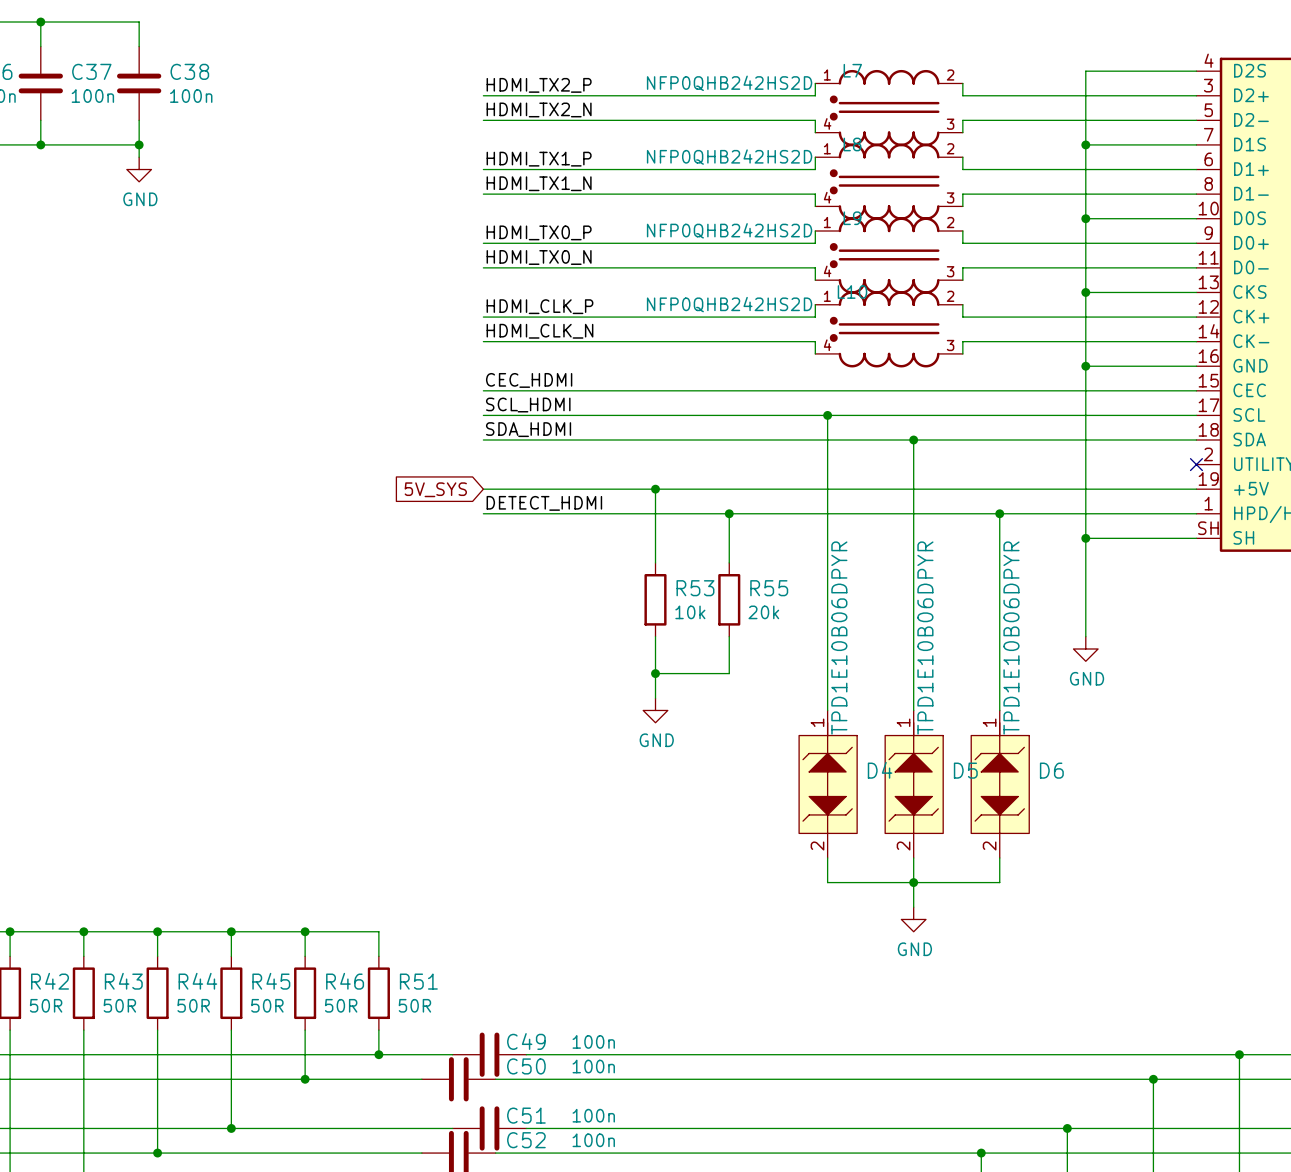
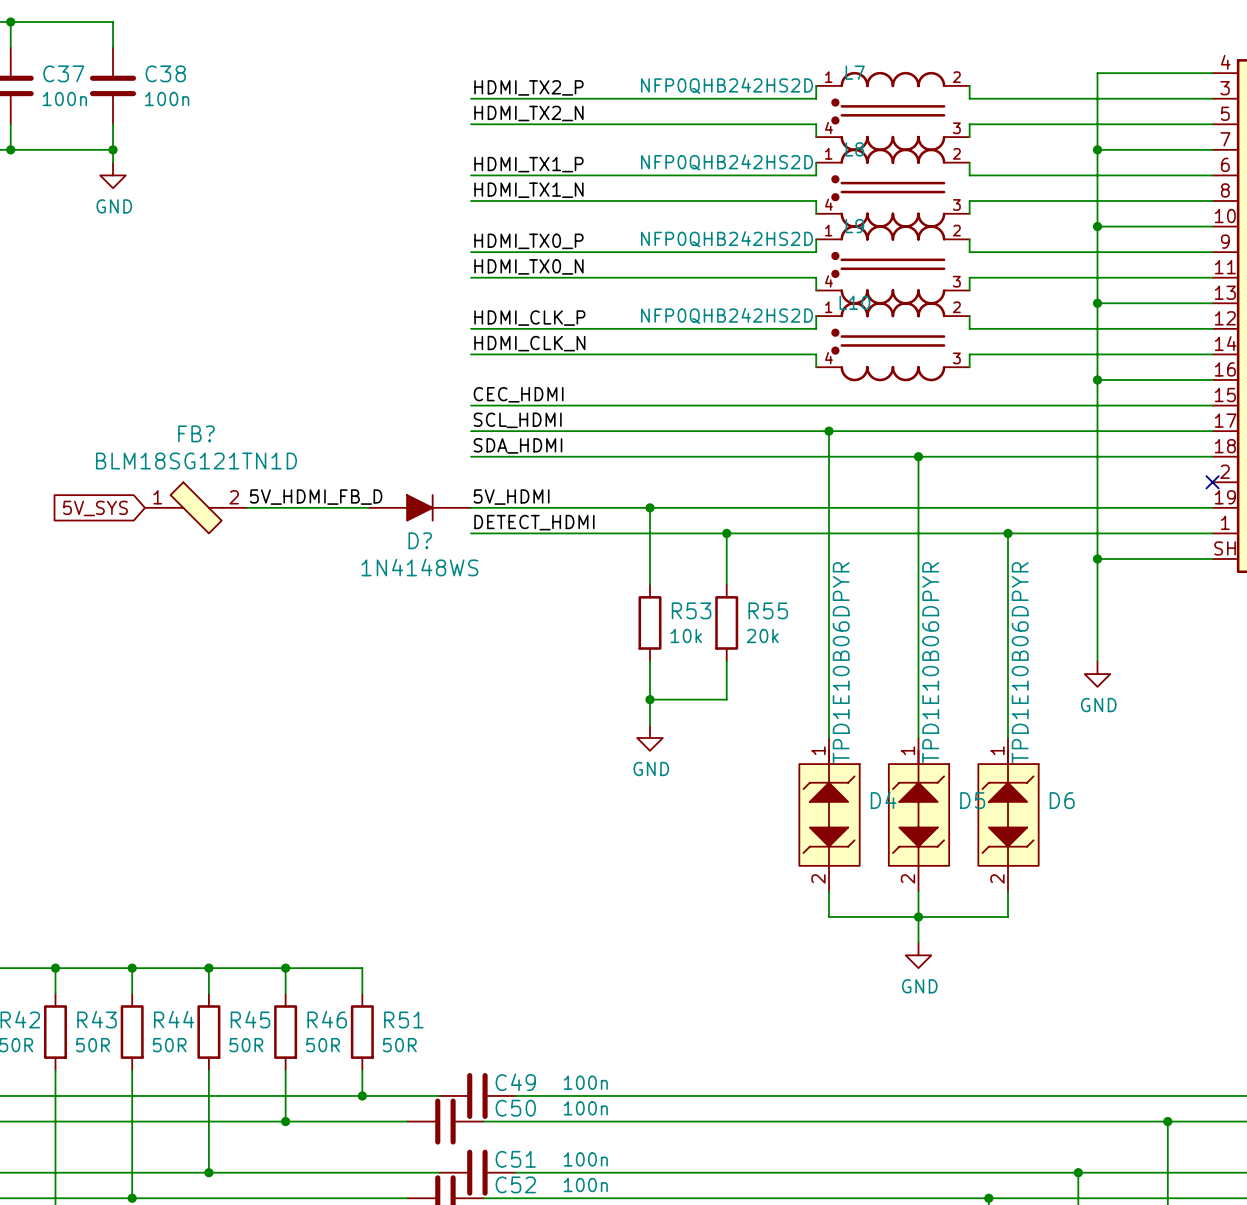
label: none -> 5V_HDMI_FB_D (316, 497)
label: none -> 5V_HDMI (511, 497)
global label: none -> 5V_SYS (95, 508)
FB?: none -> BLM18SG121TN1D (196, 507)
wire: none -> (247, 507) (368, 507)
D?: none -> 1N4148WS (419, 507)
global label: 5V_SYS (435, 489) -> none

